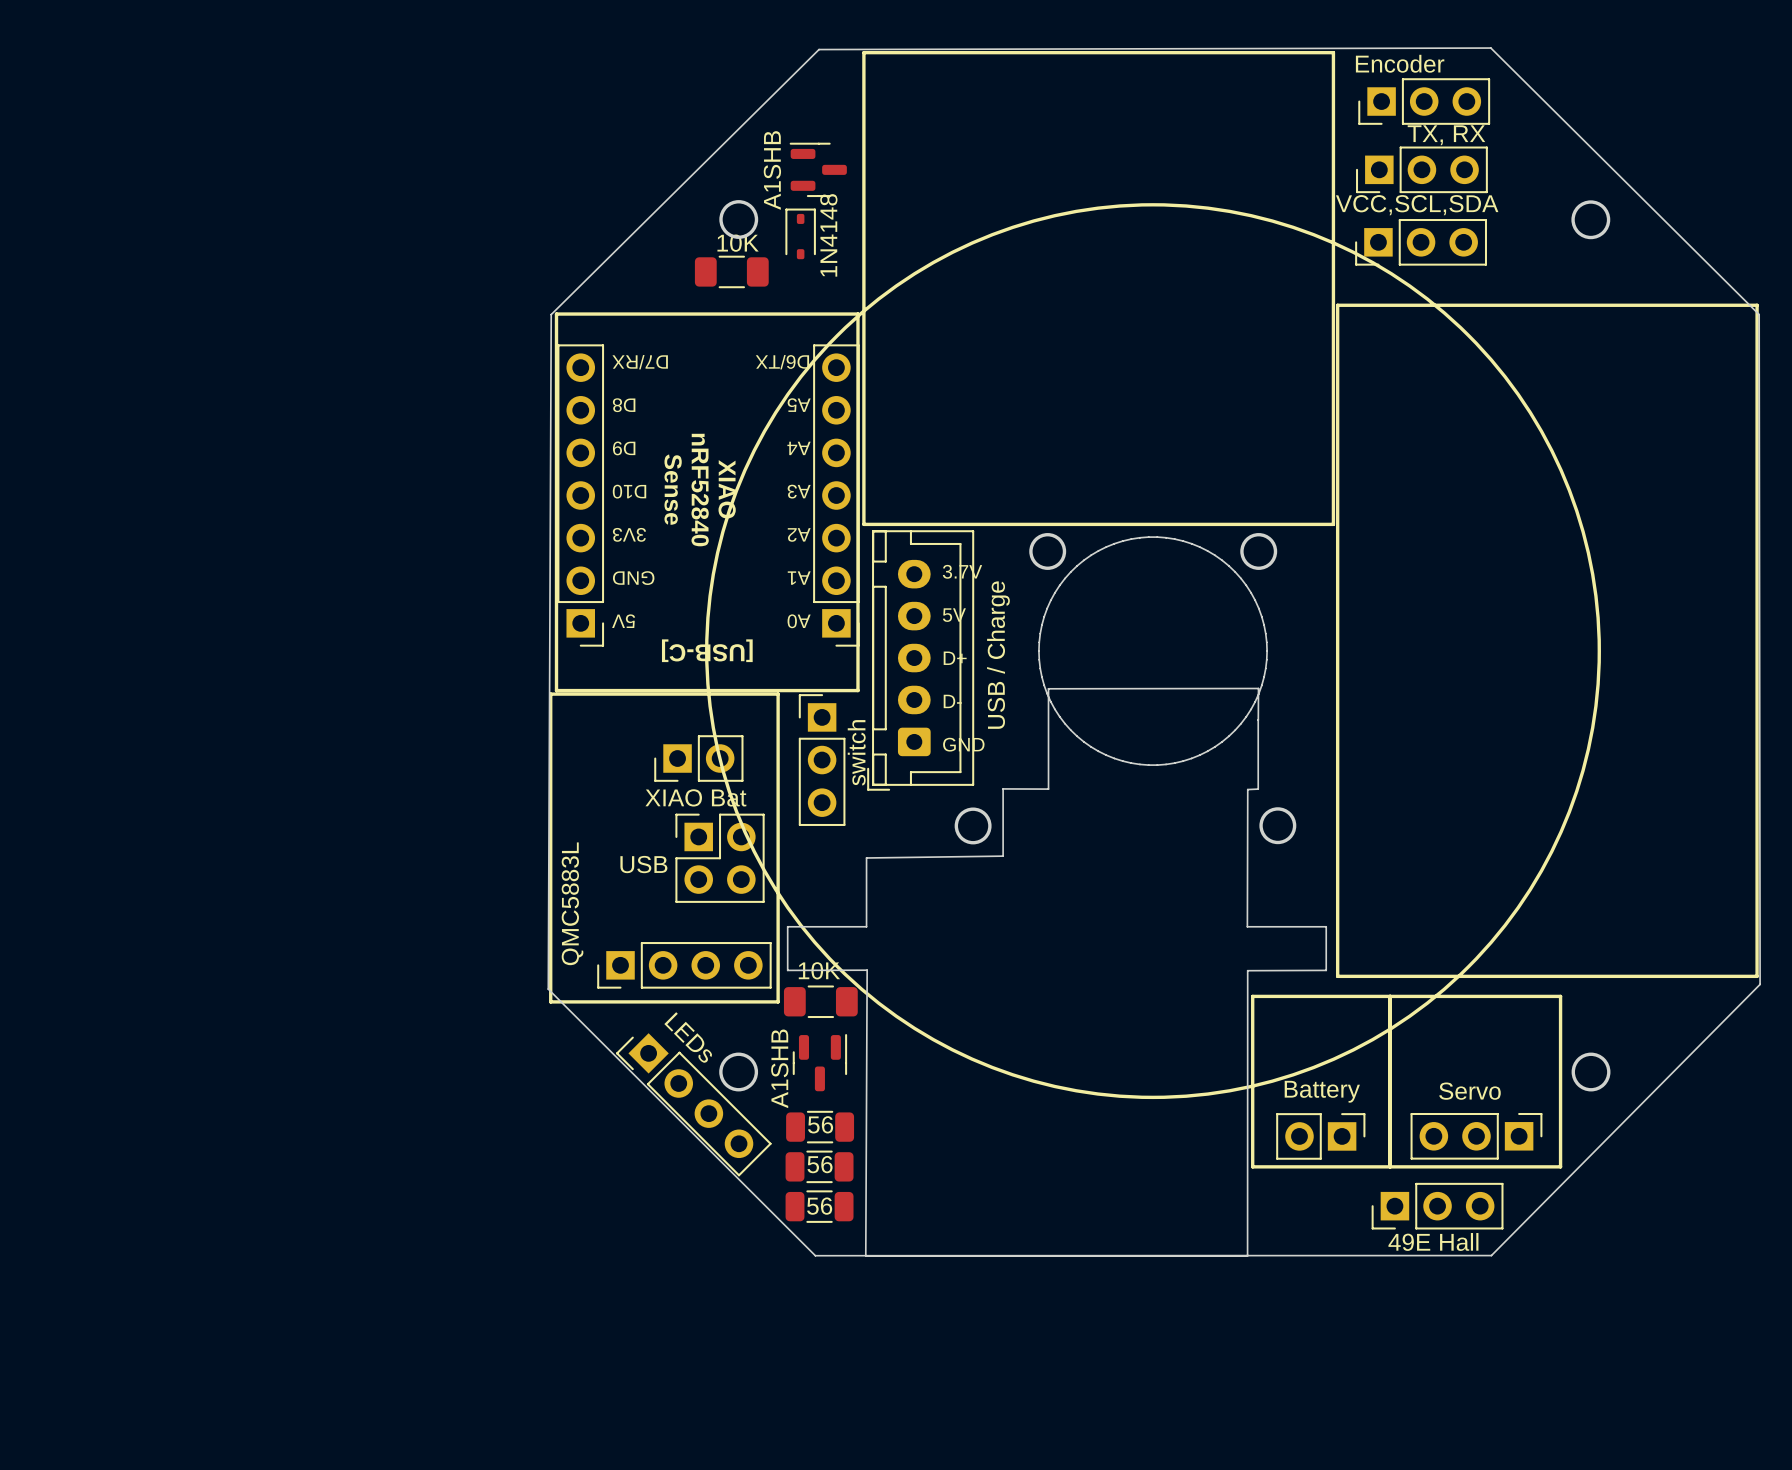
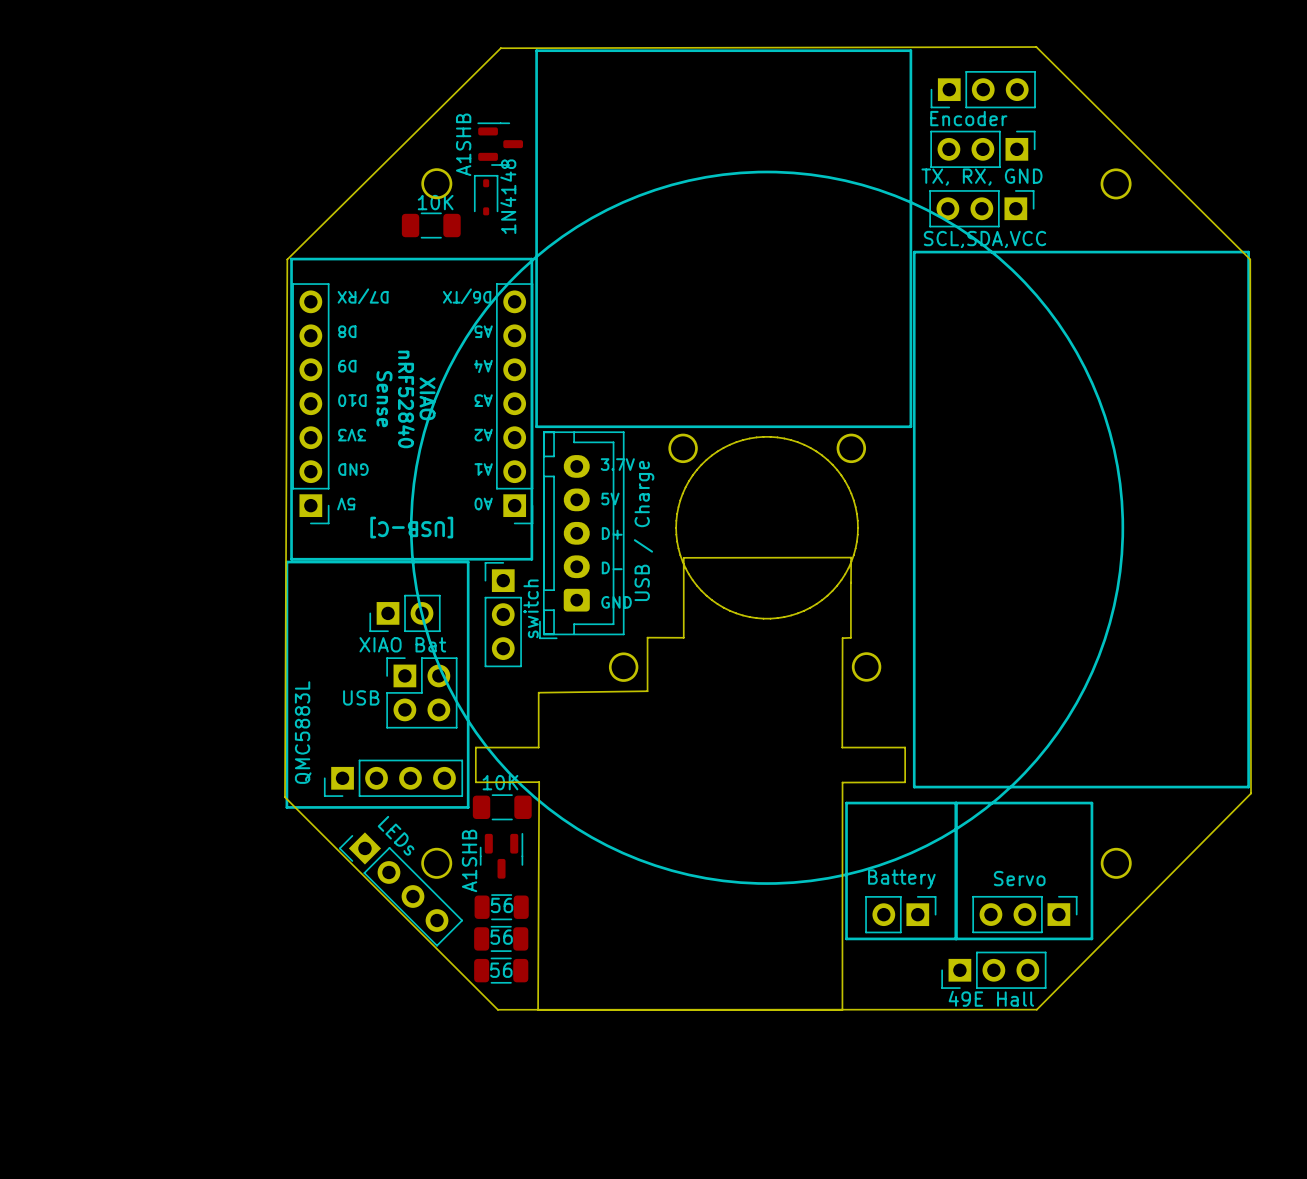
part value position: Encoder (1400, 63) -> Encoder (968, 118)
part value: TX, RX (1446, 135) -> TX, RX, GND (981, 177)
part rotation: 0° (1421, 169) -> 180° (982, 149)
part value: VCC,SCL,SDA (1417, 205) -> SCL,SDA,VCC (985, 239)
part rotation: 0° (1421, 242) -> 180° (981, 208)

